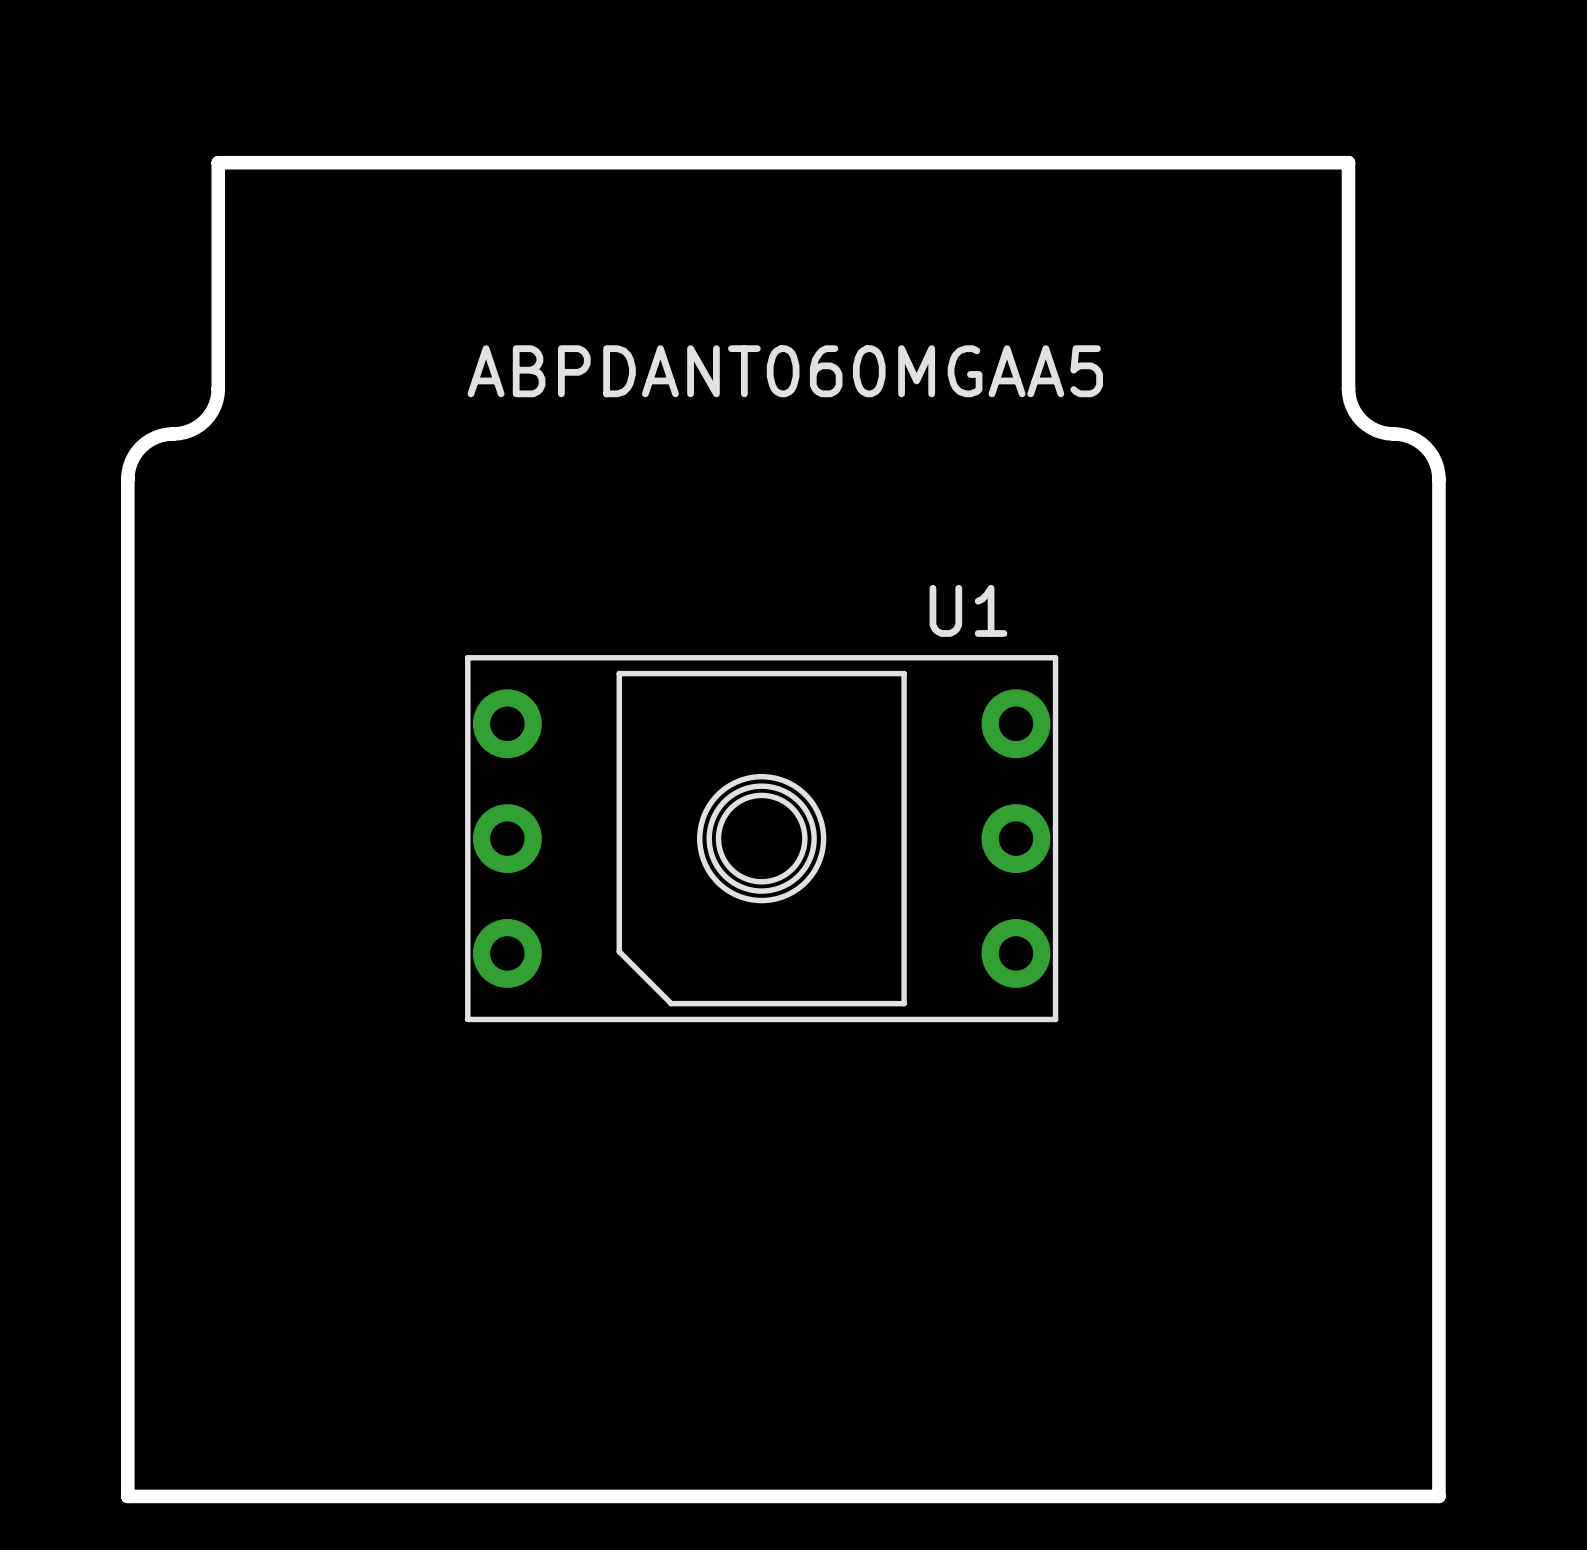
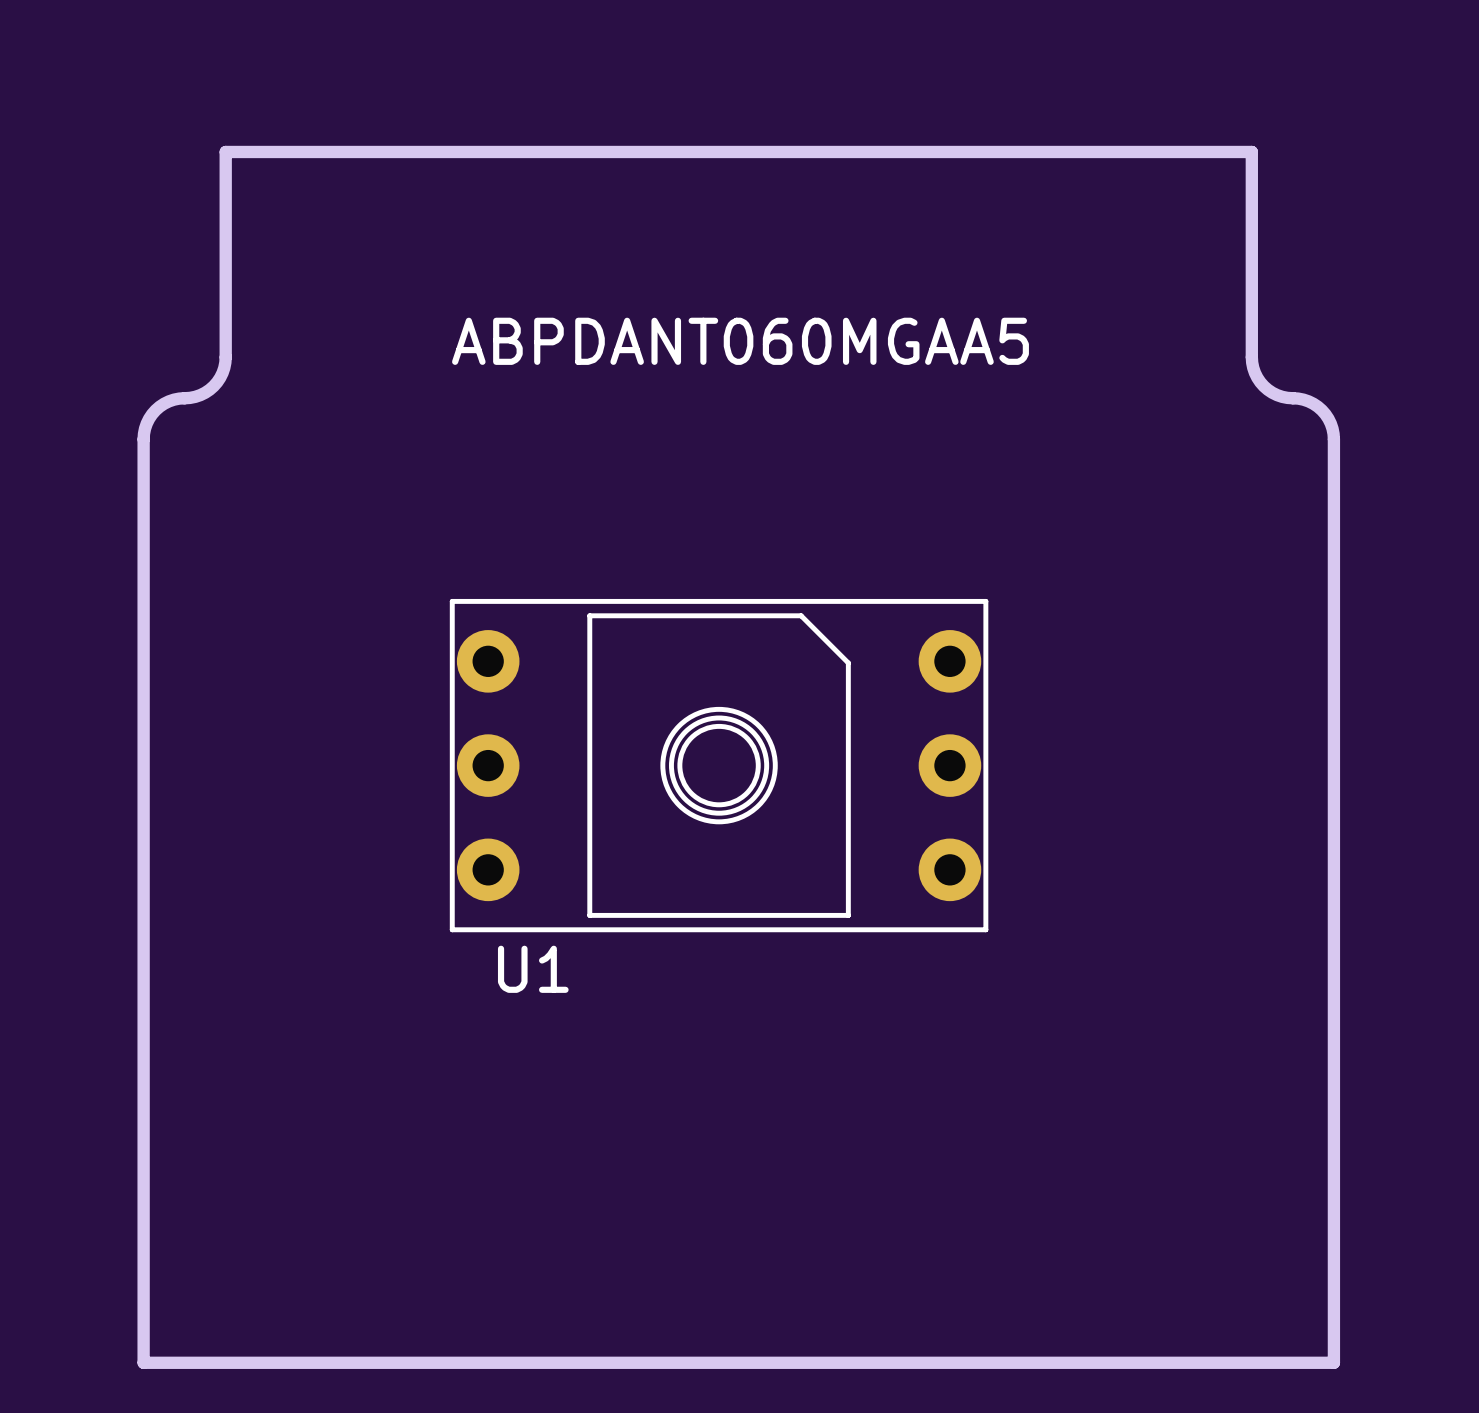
U1 rotation: 0° (761, 838) -> 180° (719, 765)

